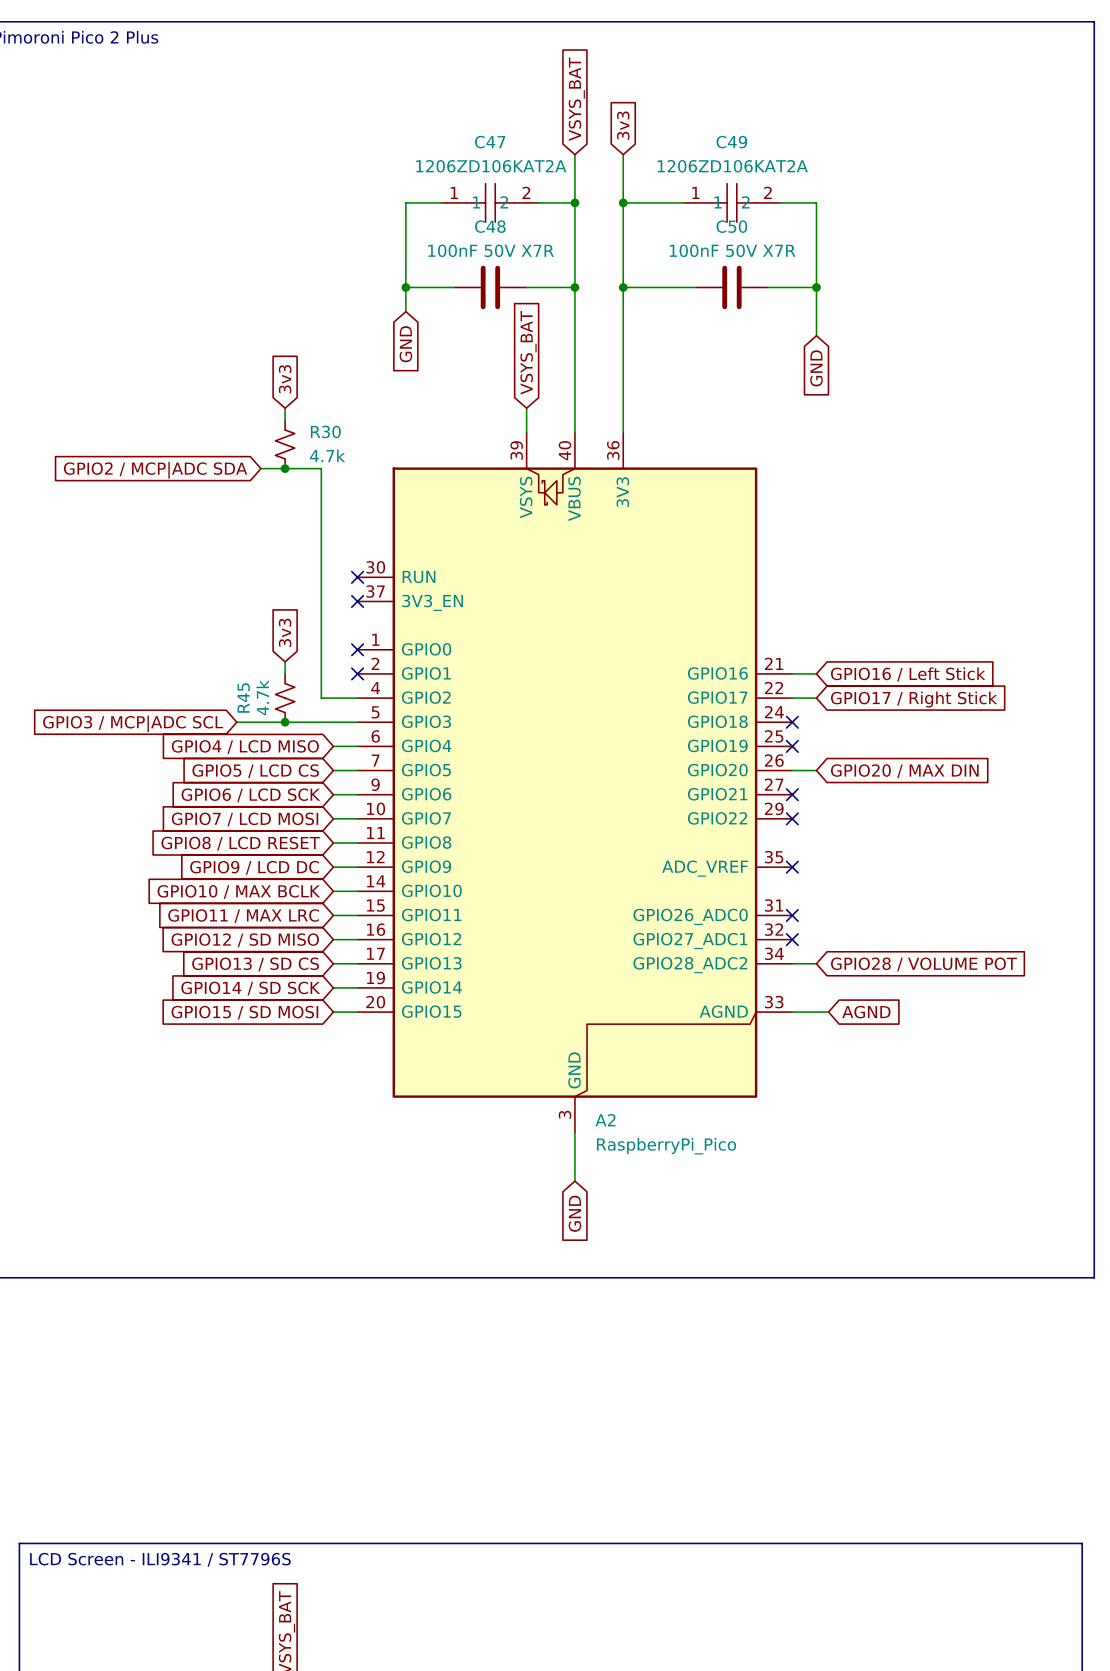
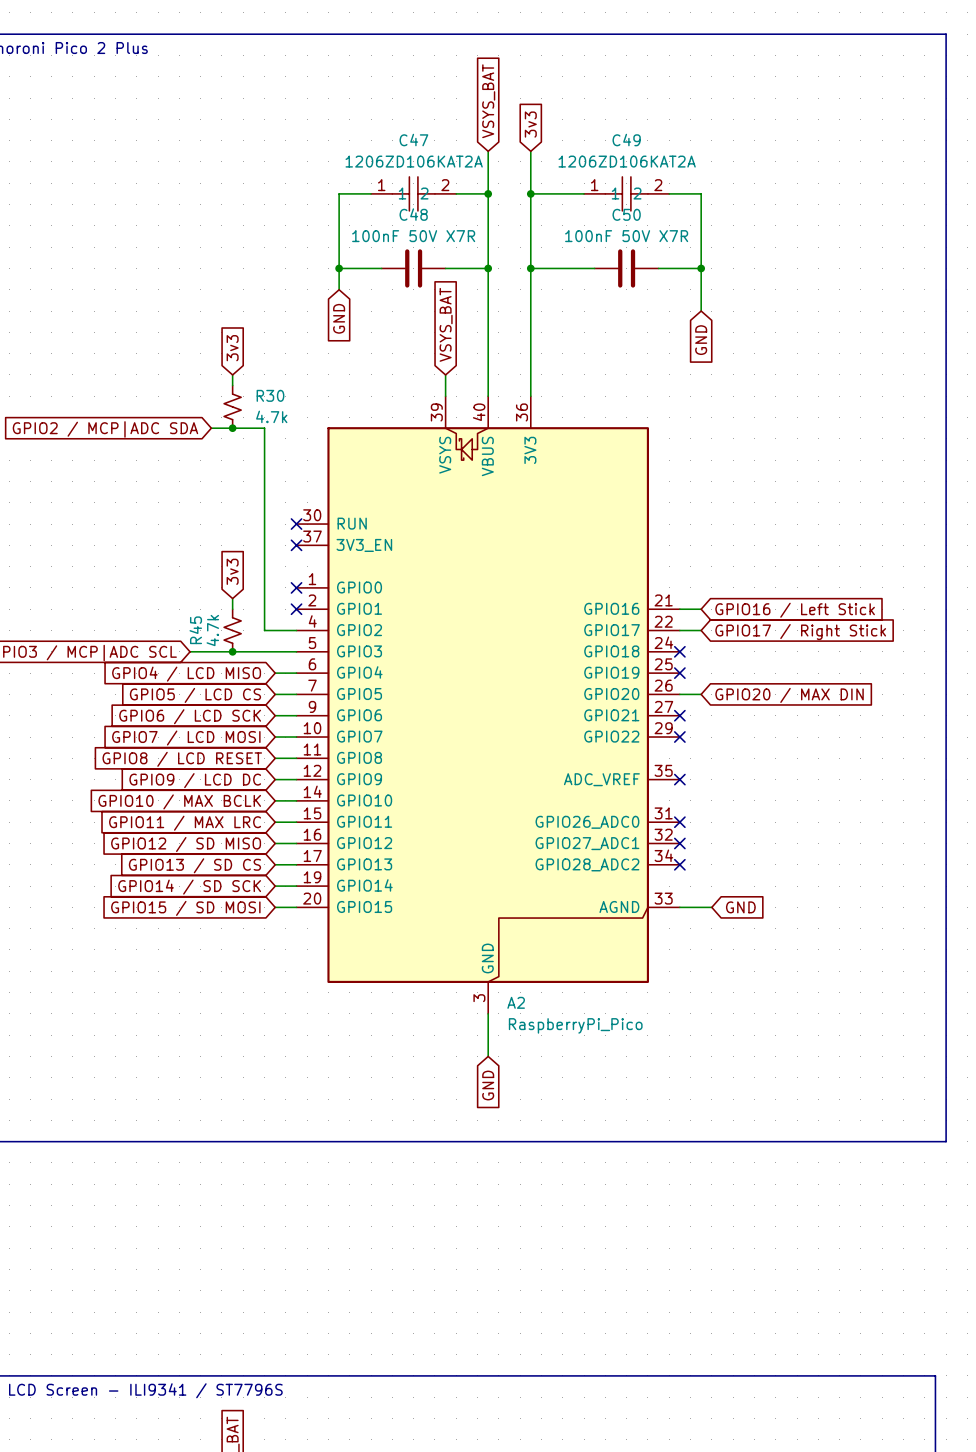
wire: (792, 963) (816, 963) -> none
no-connect mark: none -> (679, 864)
global label: GPIO28 / VOLUME POT (923, 964) -> none
global label: AGND (866, 1012) -> GND (740, 907)

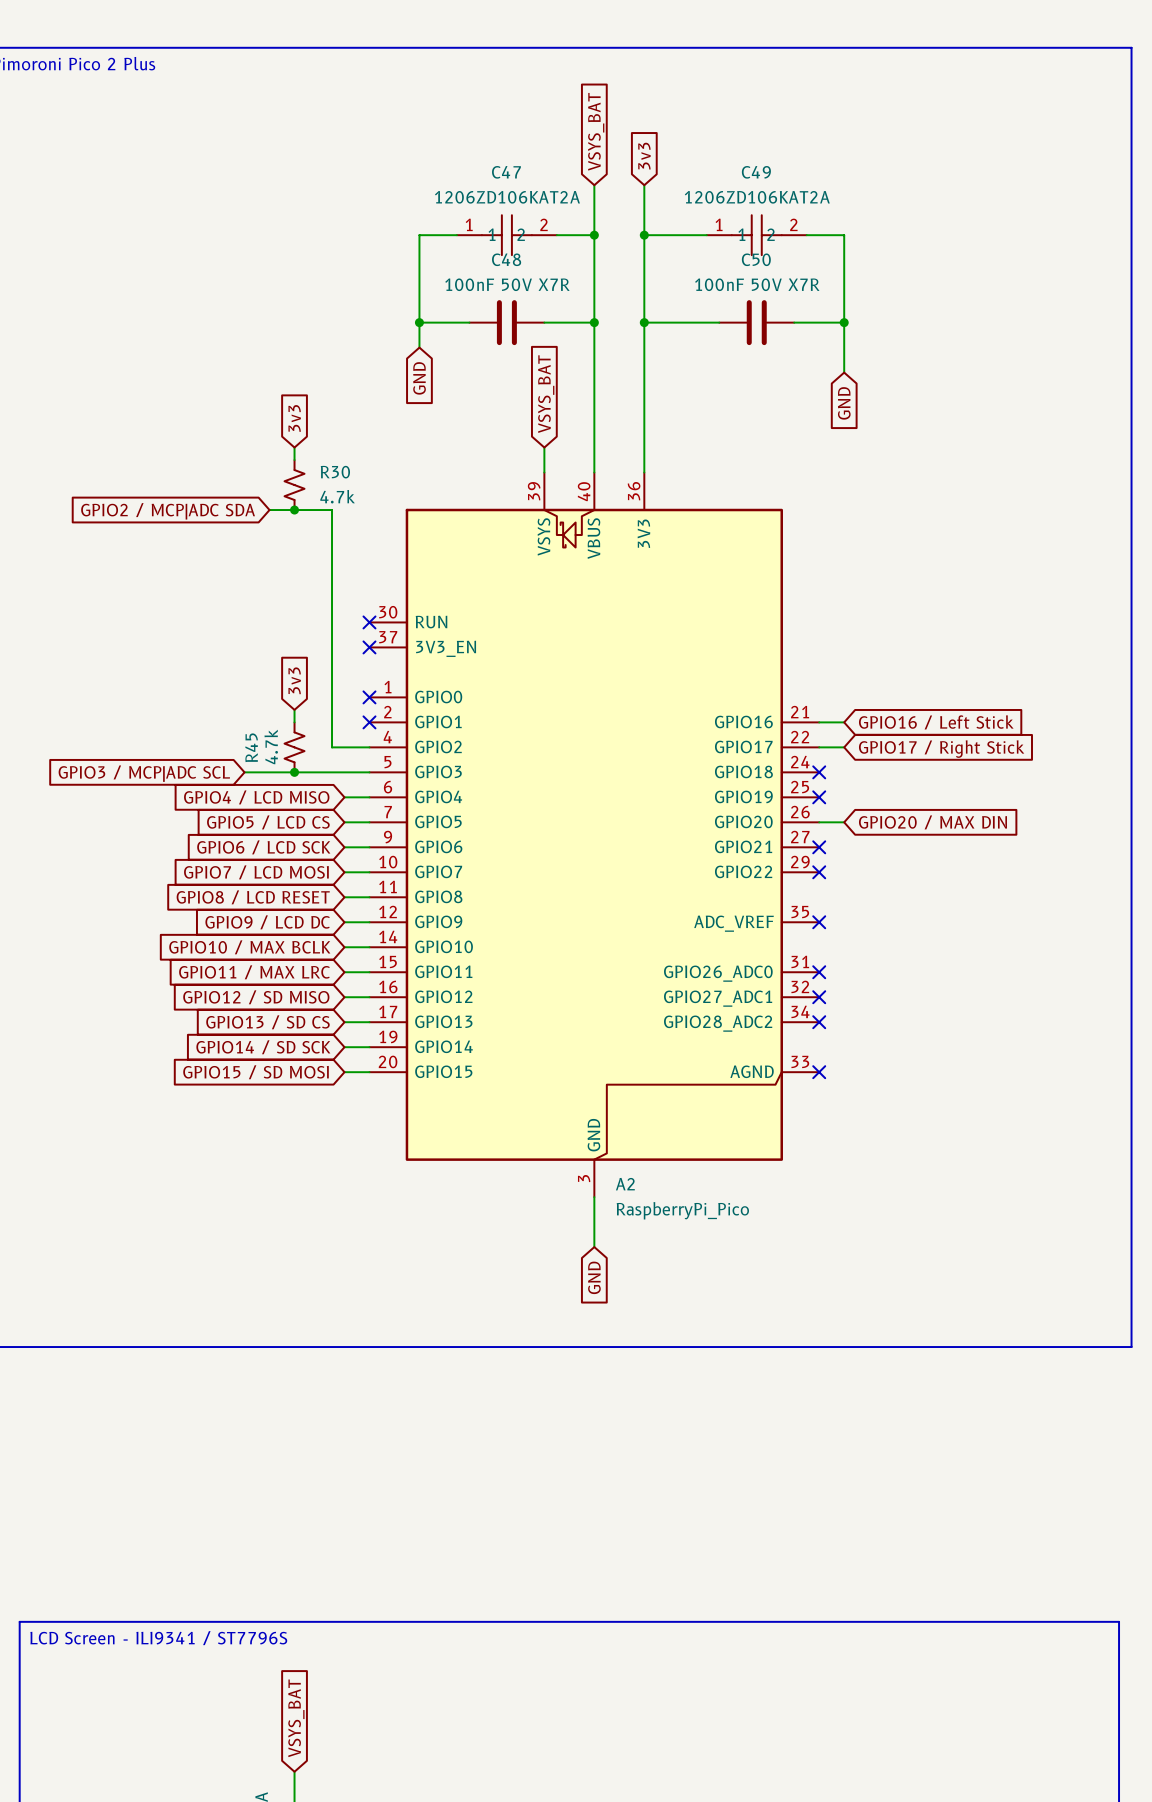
wire: (679, 907) (711, 907) -> none
no-connect mark: none -> (819, 1072)
global label: GND (740, 907) -> none

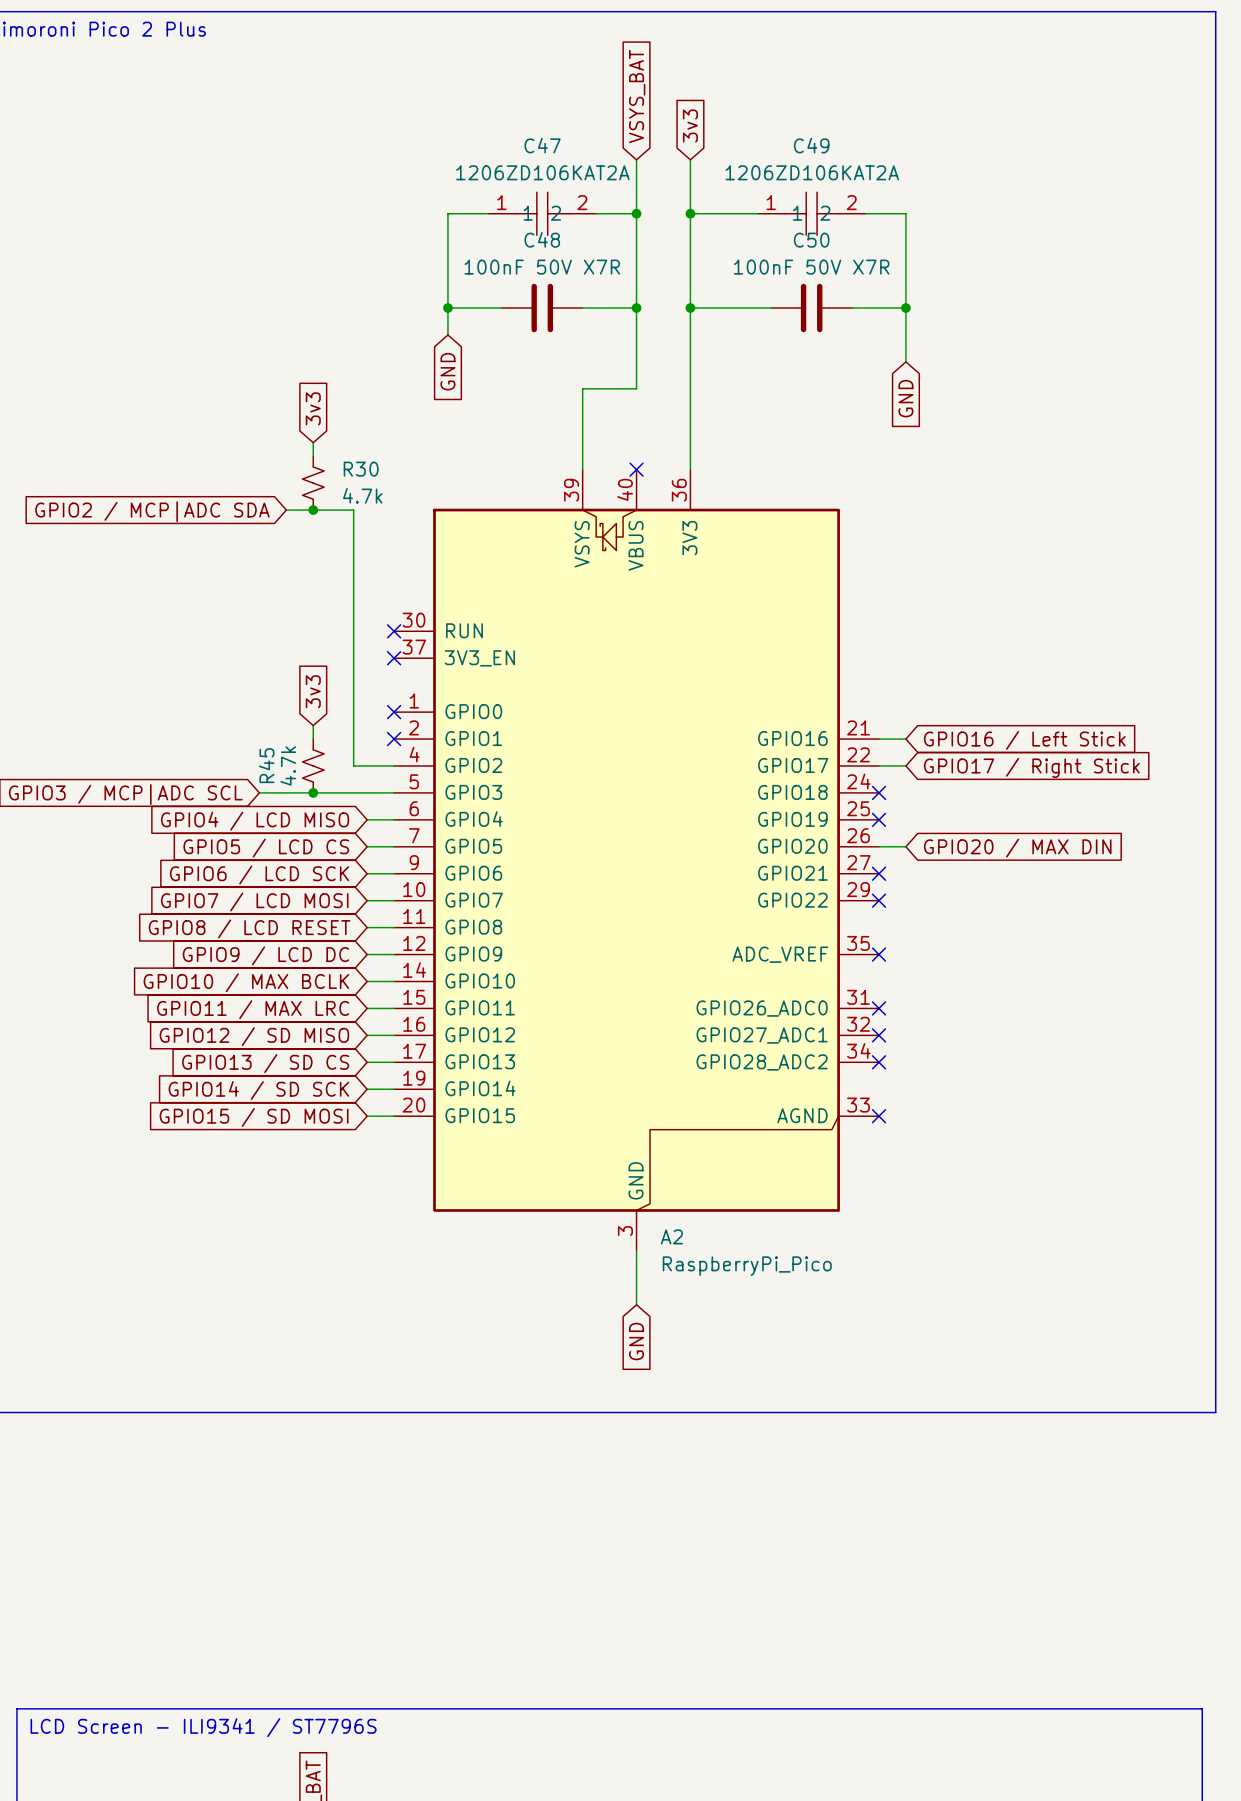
global label: VSYS_BAT (546, 394) -> none
wire: (594, 397) (594, 472) -> (636, 388) (582, 388) (582, 442)
no-connect mark: none -> (636, 469)

